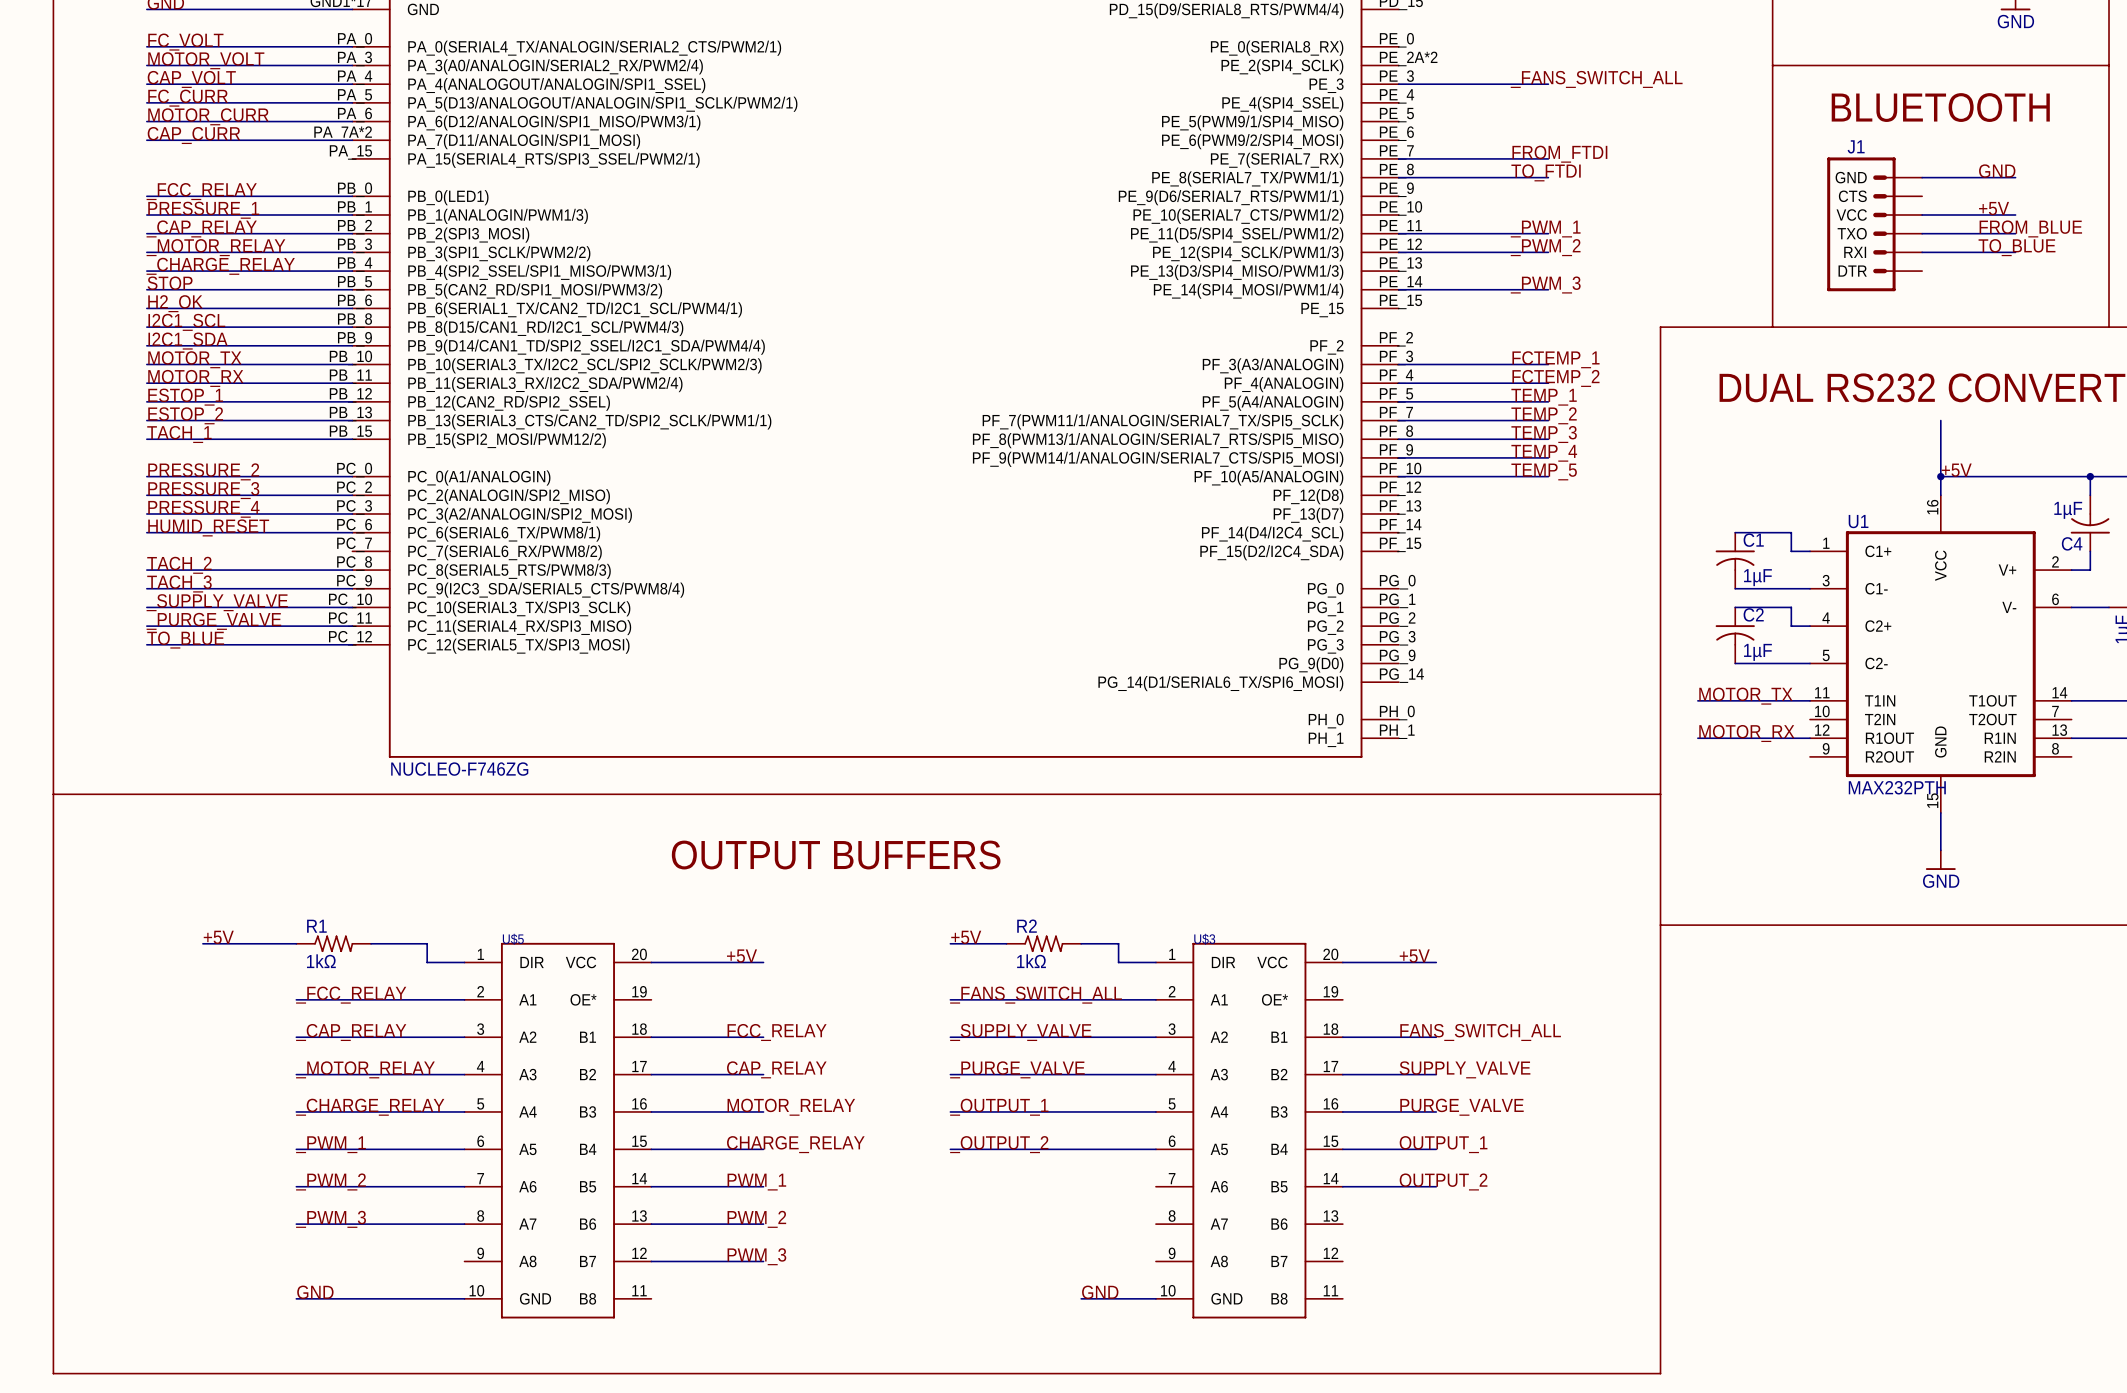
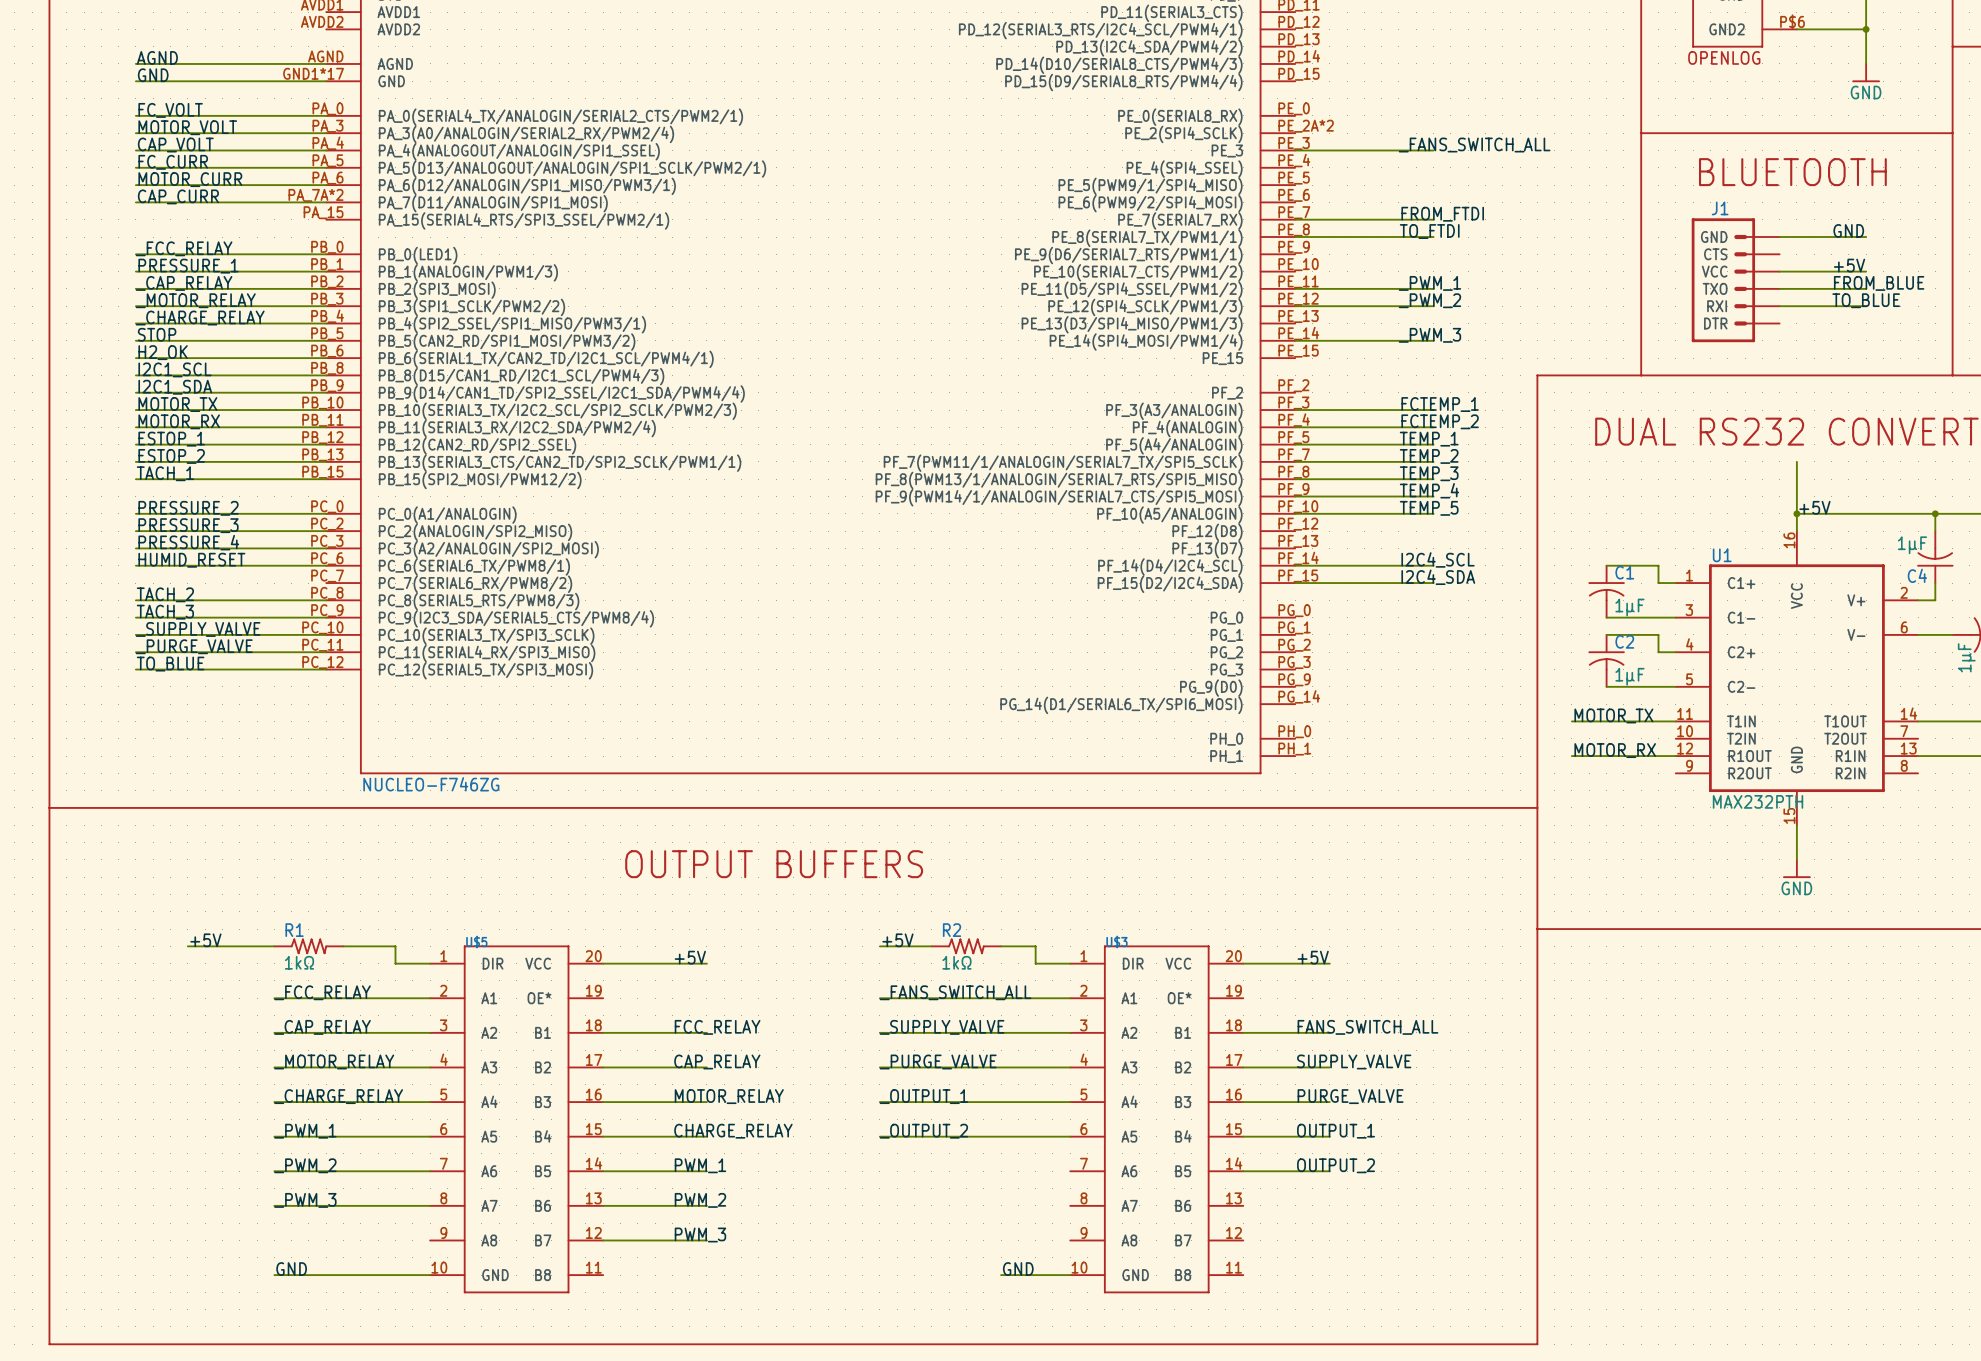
label: none -> I2C4_SCL (1438, 559)
wire: none -> (1295, 565) (1433, 565)
label: none -> I2C4_SDA (1438, 577)
wire: none -> (1295, 583) (1433, 583)

